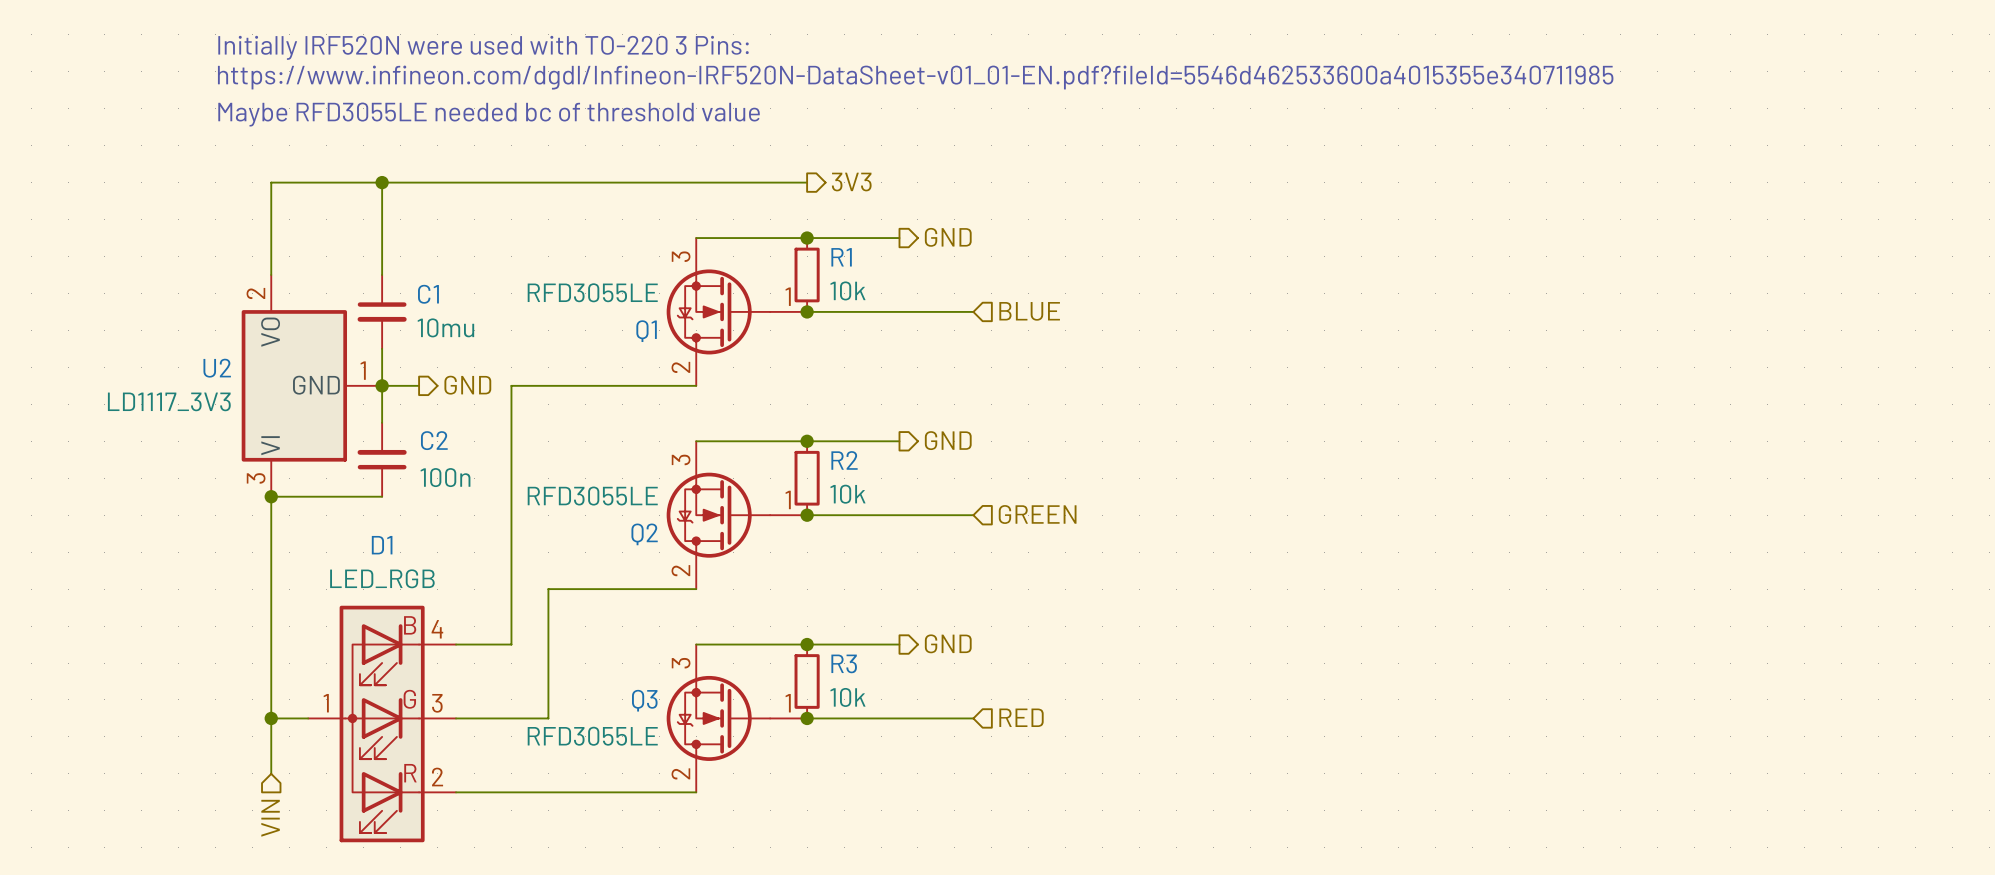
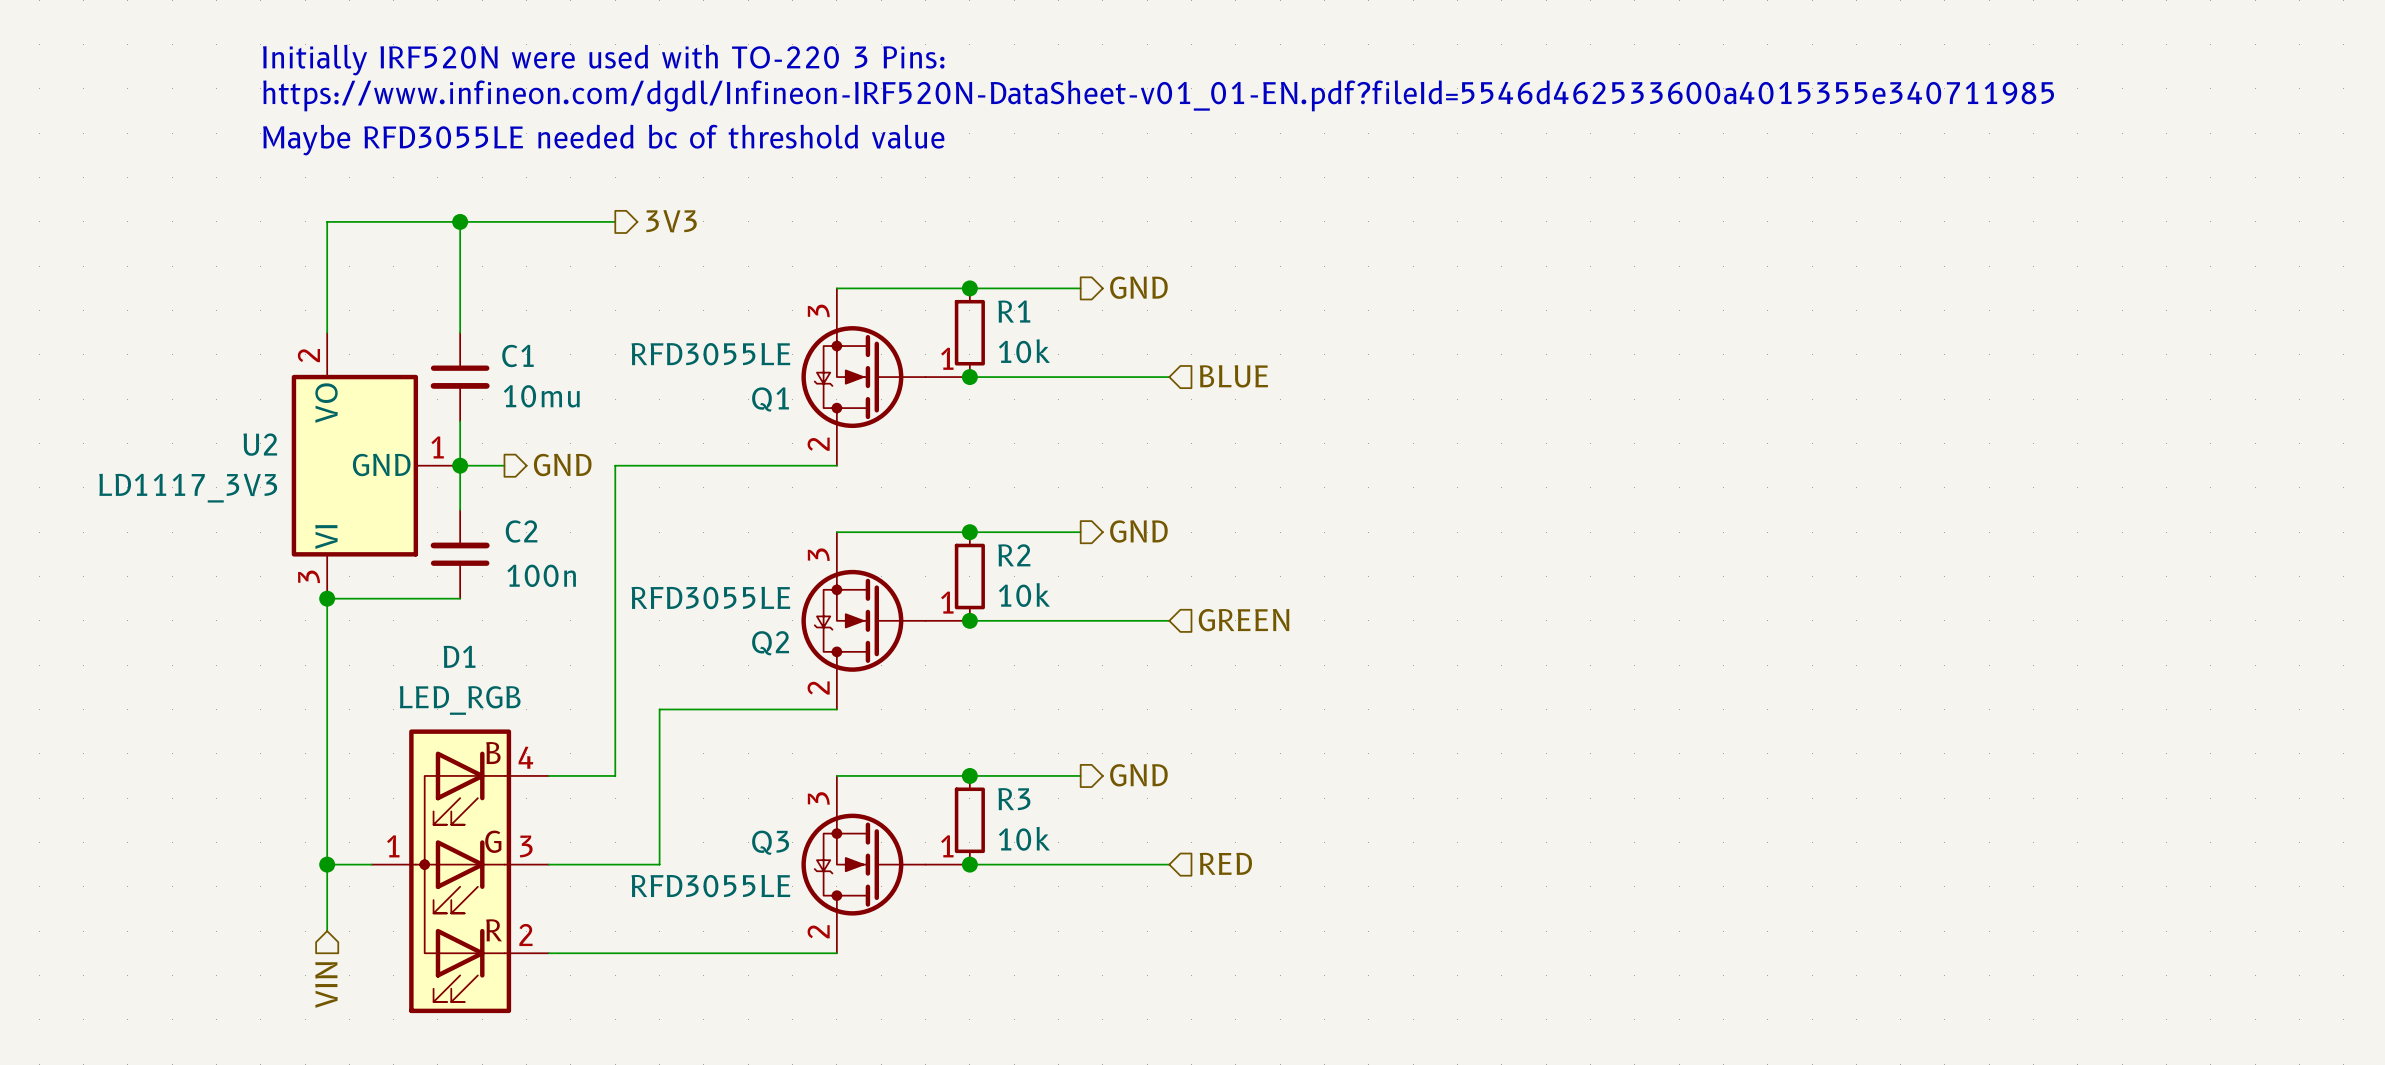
wire: (511, 182) (807, 182) -> none
hierarchical label position: 3V3 (851, 182) -> 3V3 (671, 221)

